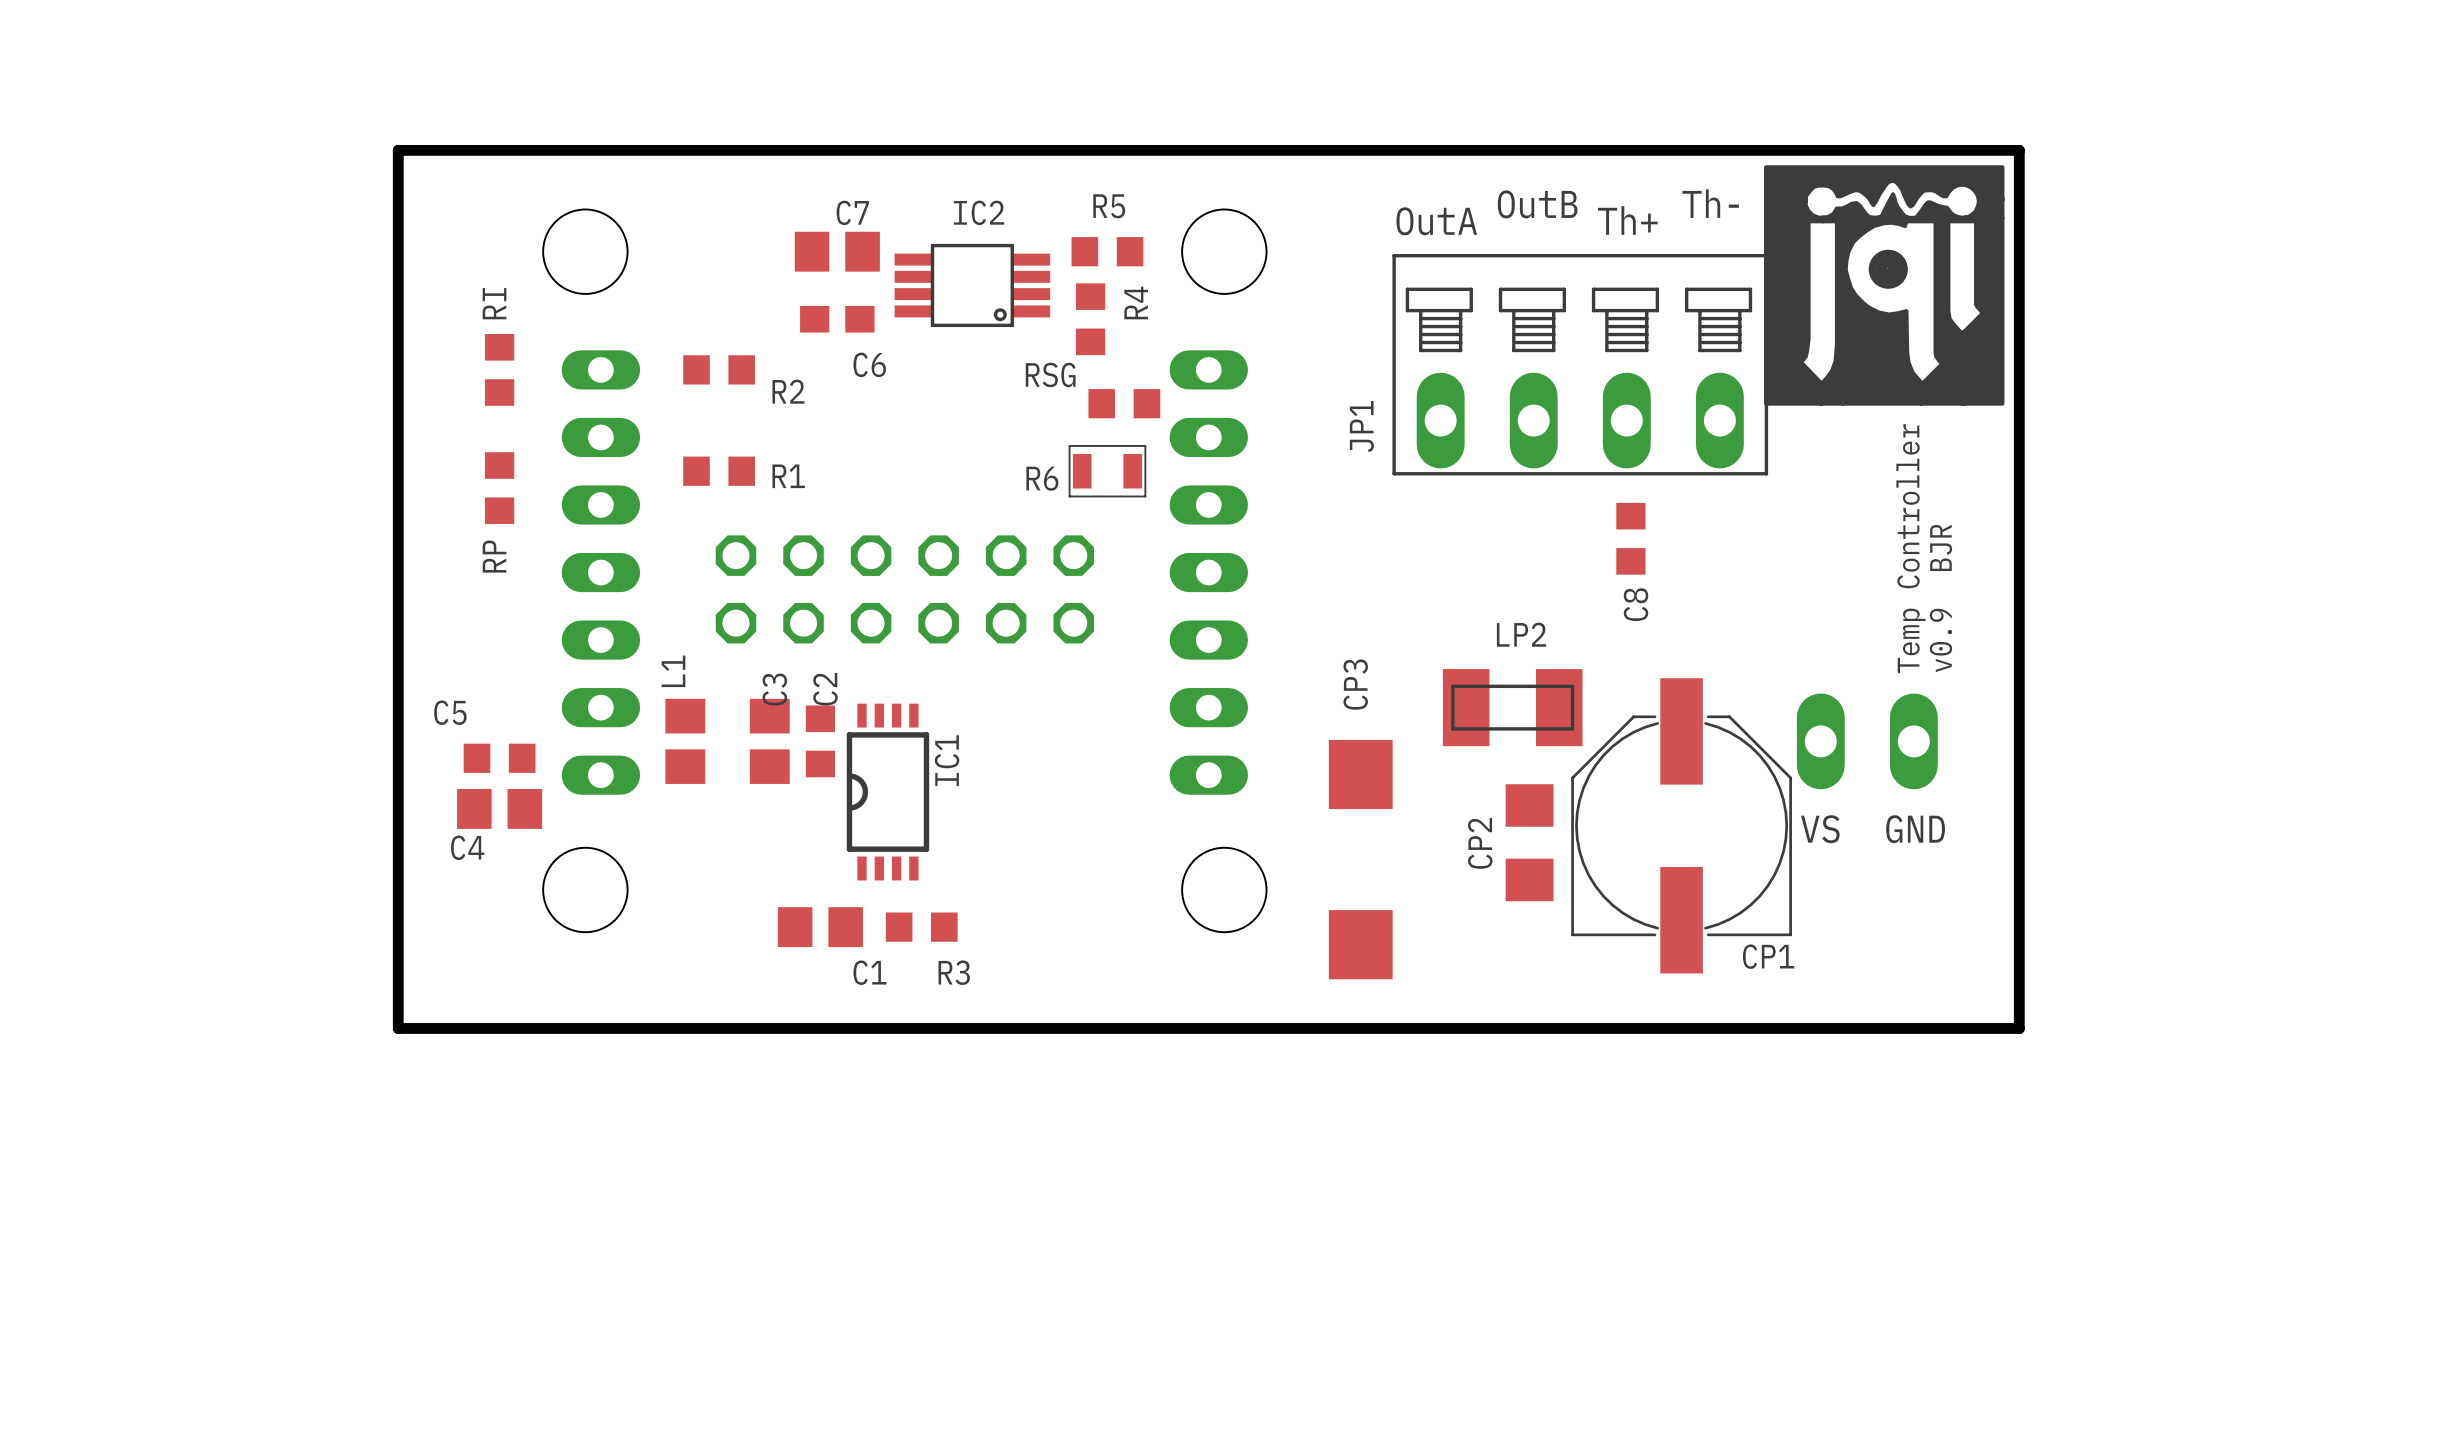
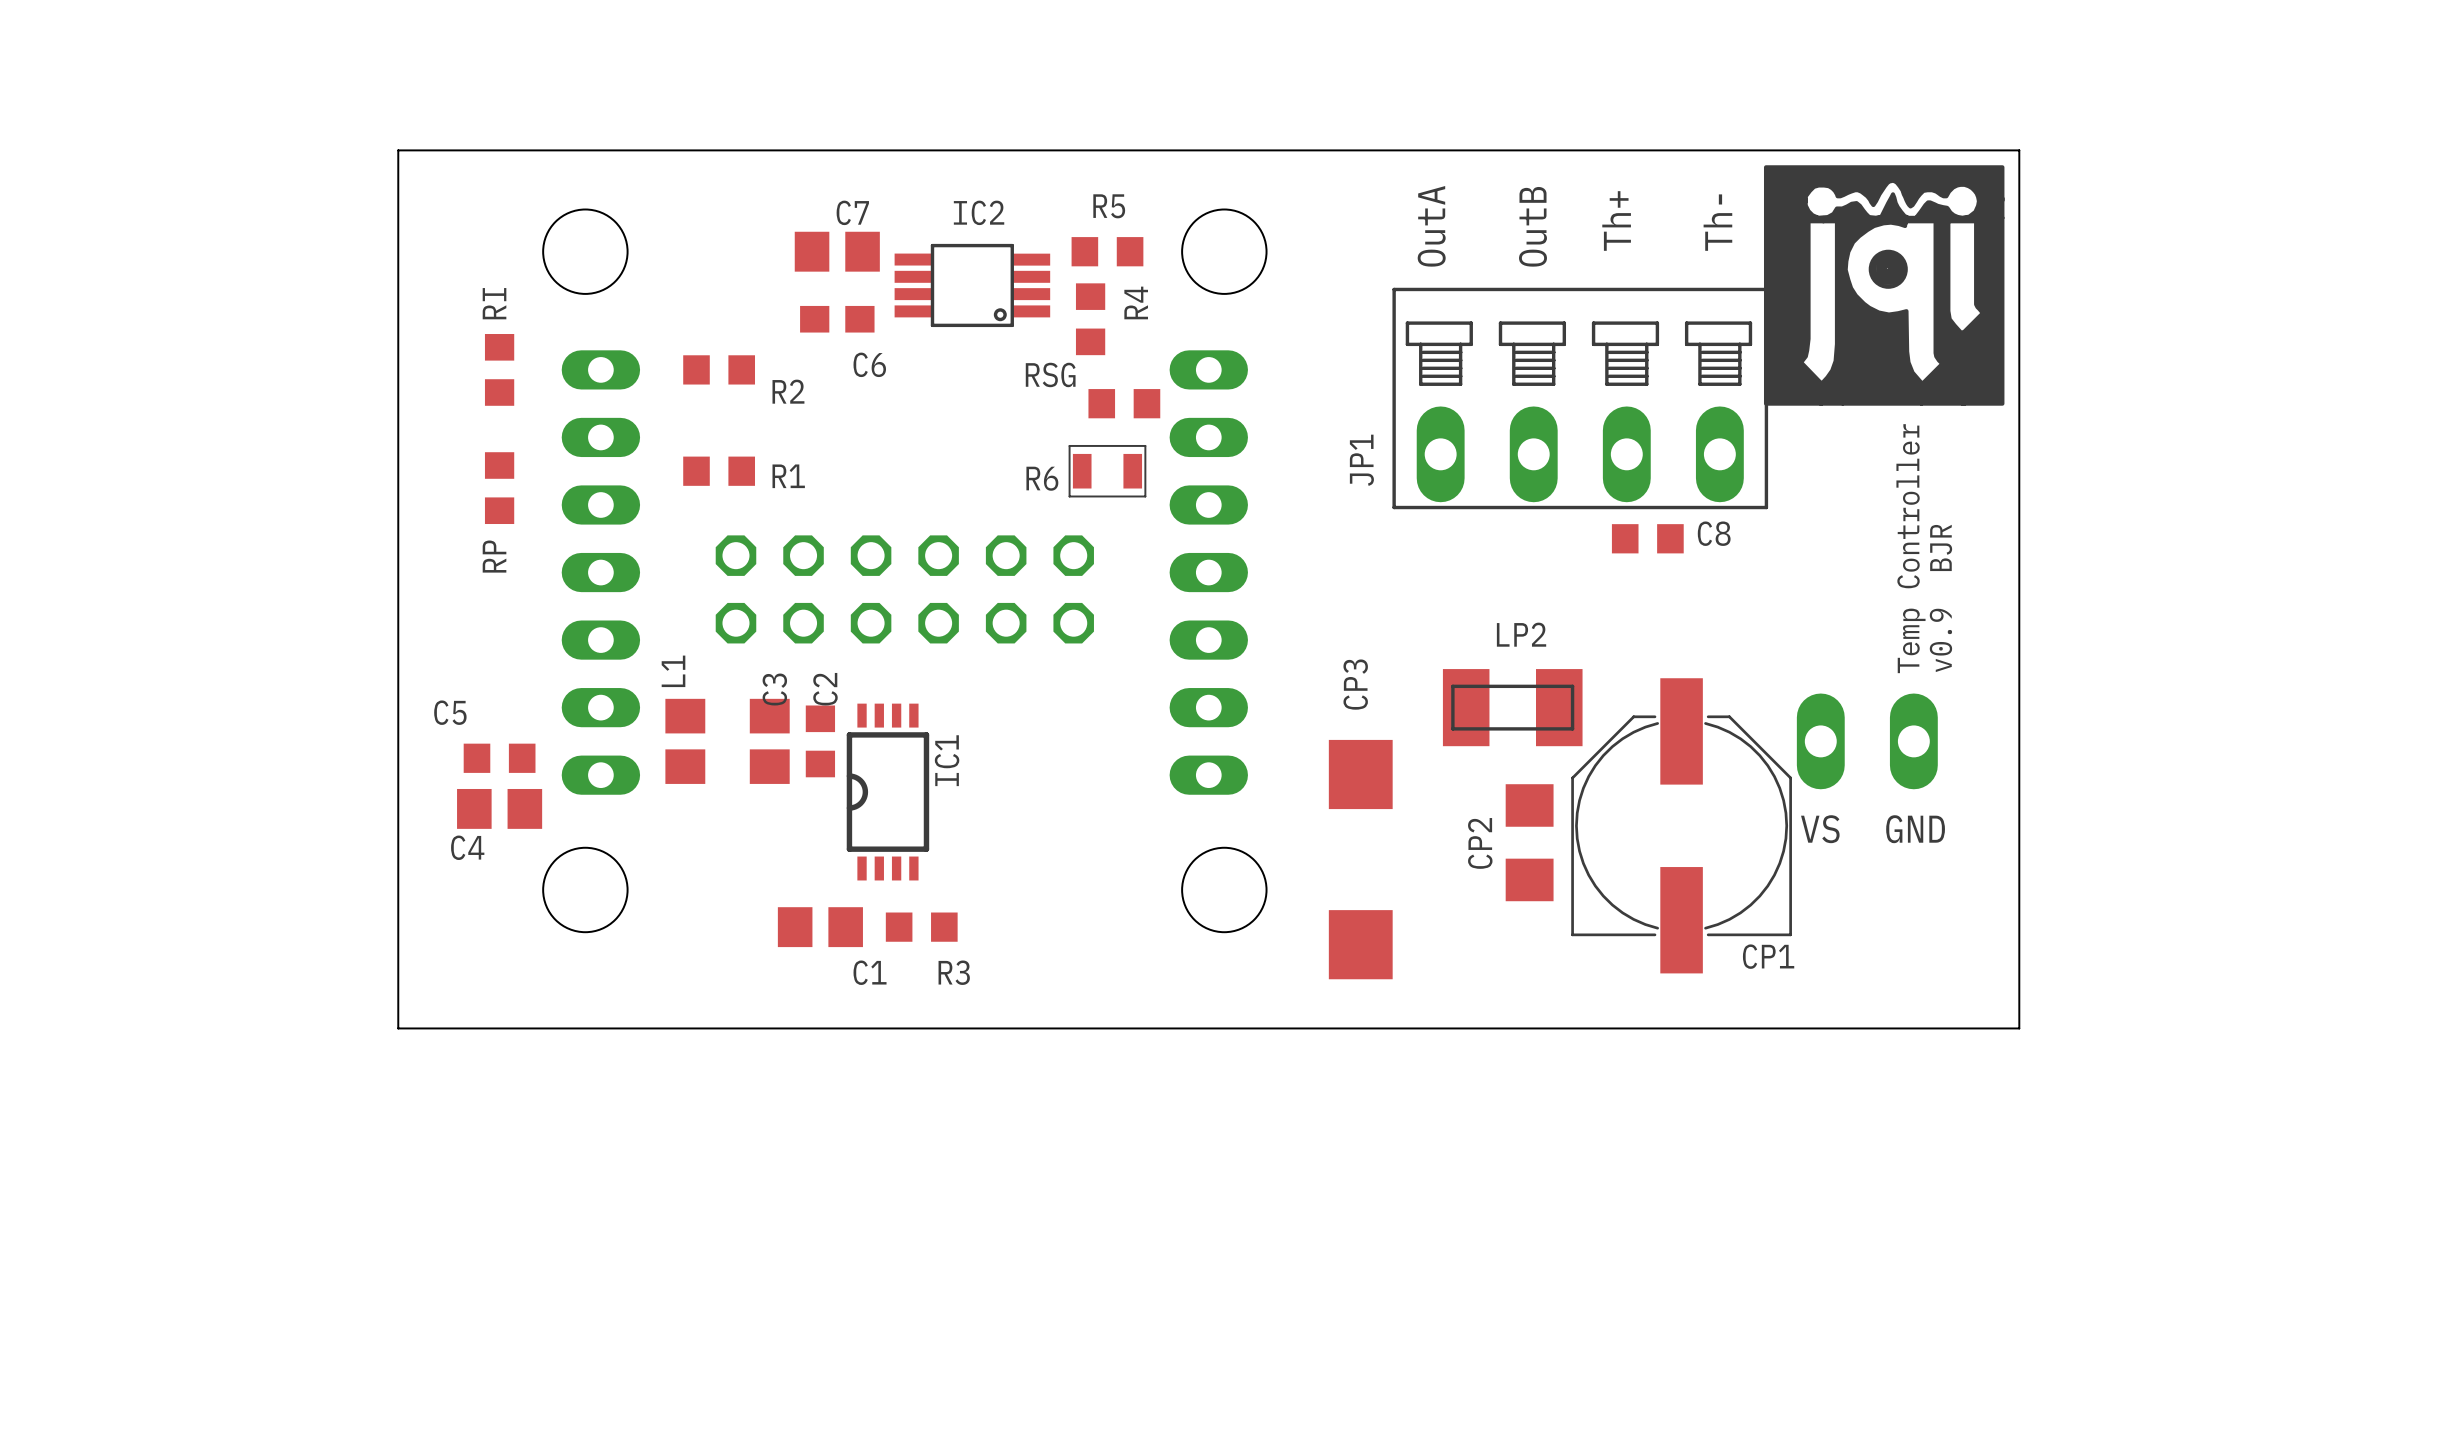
board edge width: thick (398, 150) (398, 1028) (2019, 1028) (2019, 150) (398, 150) -> thin (398, 150) (398, 1028) (2019, 1028) (2019, 150) (398, 150)
text rotation: 0° (1710, 203) -> 90° counterclockwise (1717, 222)
text rotation: 0° (1537, 204) -> 90° counterclockwise (1532, 226)
text rotation: 0° (1627, 220) -> 90° counterclockwise (1616, 220)
text rotation: 0° (1436, 221) -> 90° counterclockwise (1431, 226)
JP1 position: (1580, 364) -> (1580, 398)
C8 rotation: 0° (1630, 538) -> 90° clockwise (1647, 538)
C8 name position: C8 (1635, 604) -> C8 (1714, 533)

